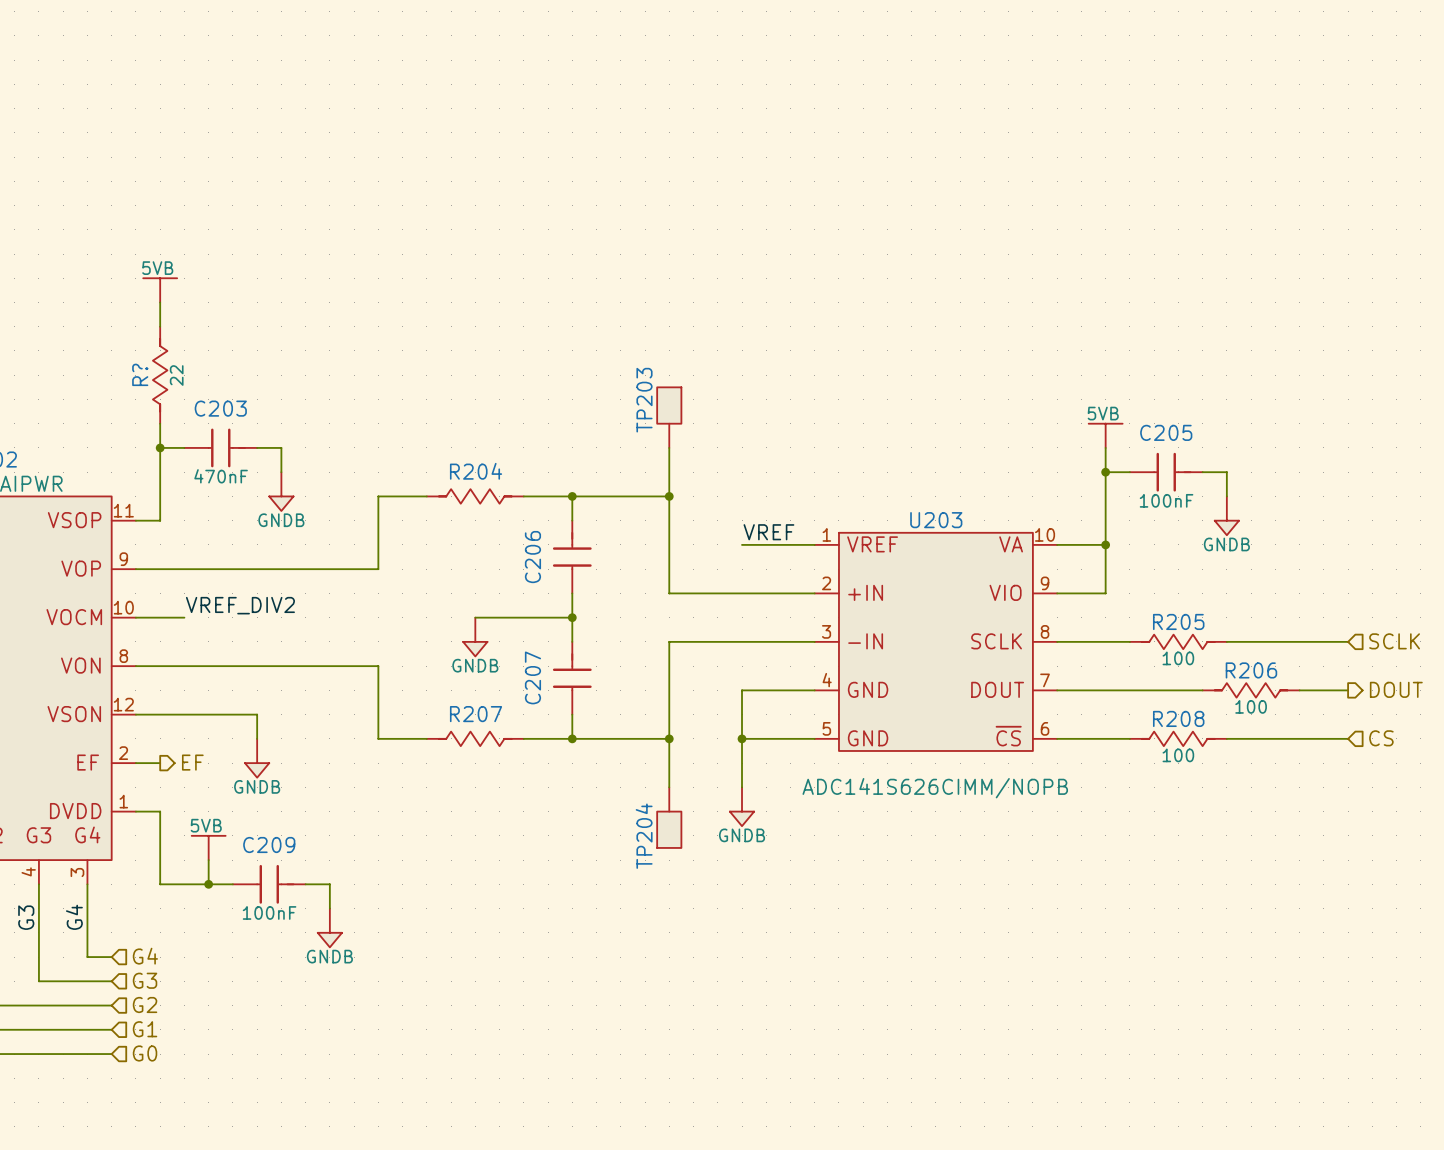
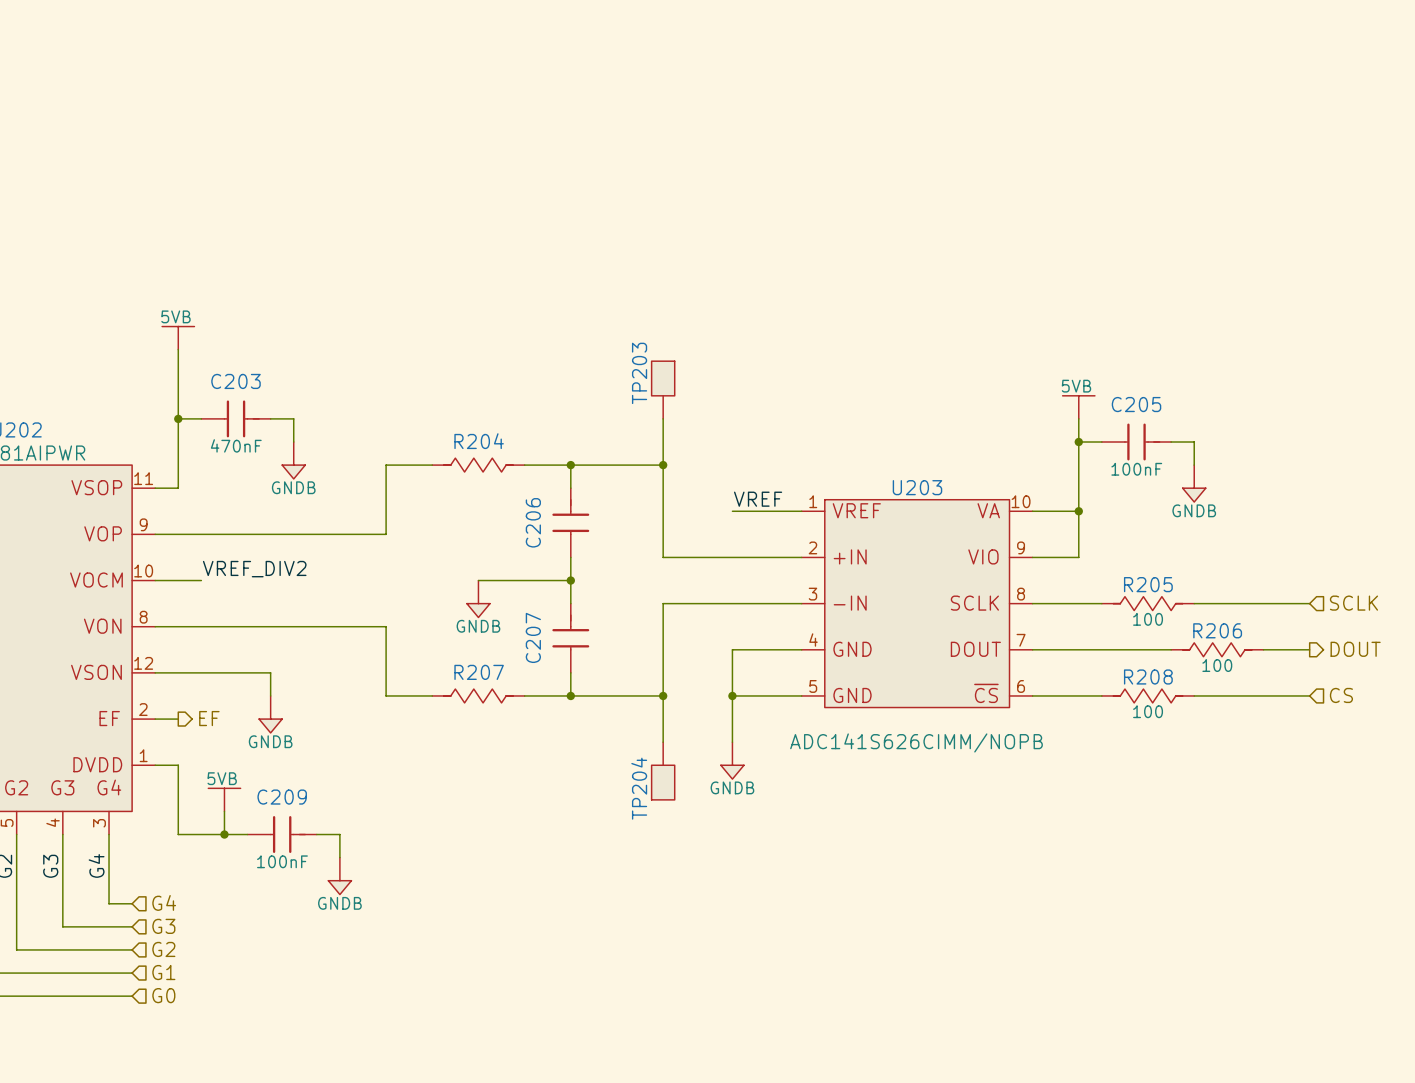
power symbol position: 5VB (160, 290) -> 5VB (178, 338)
wire: (160, 302) (160, 326) -> none
R?: (160, 375) -> none

